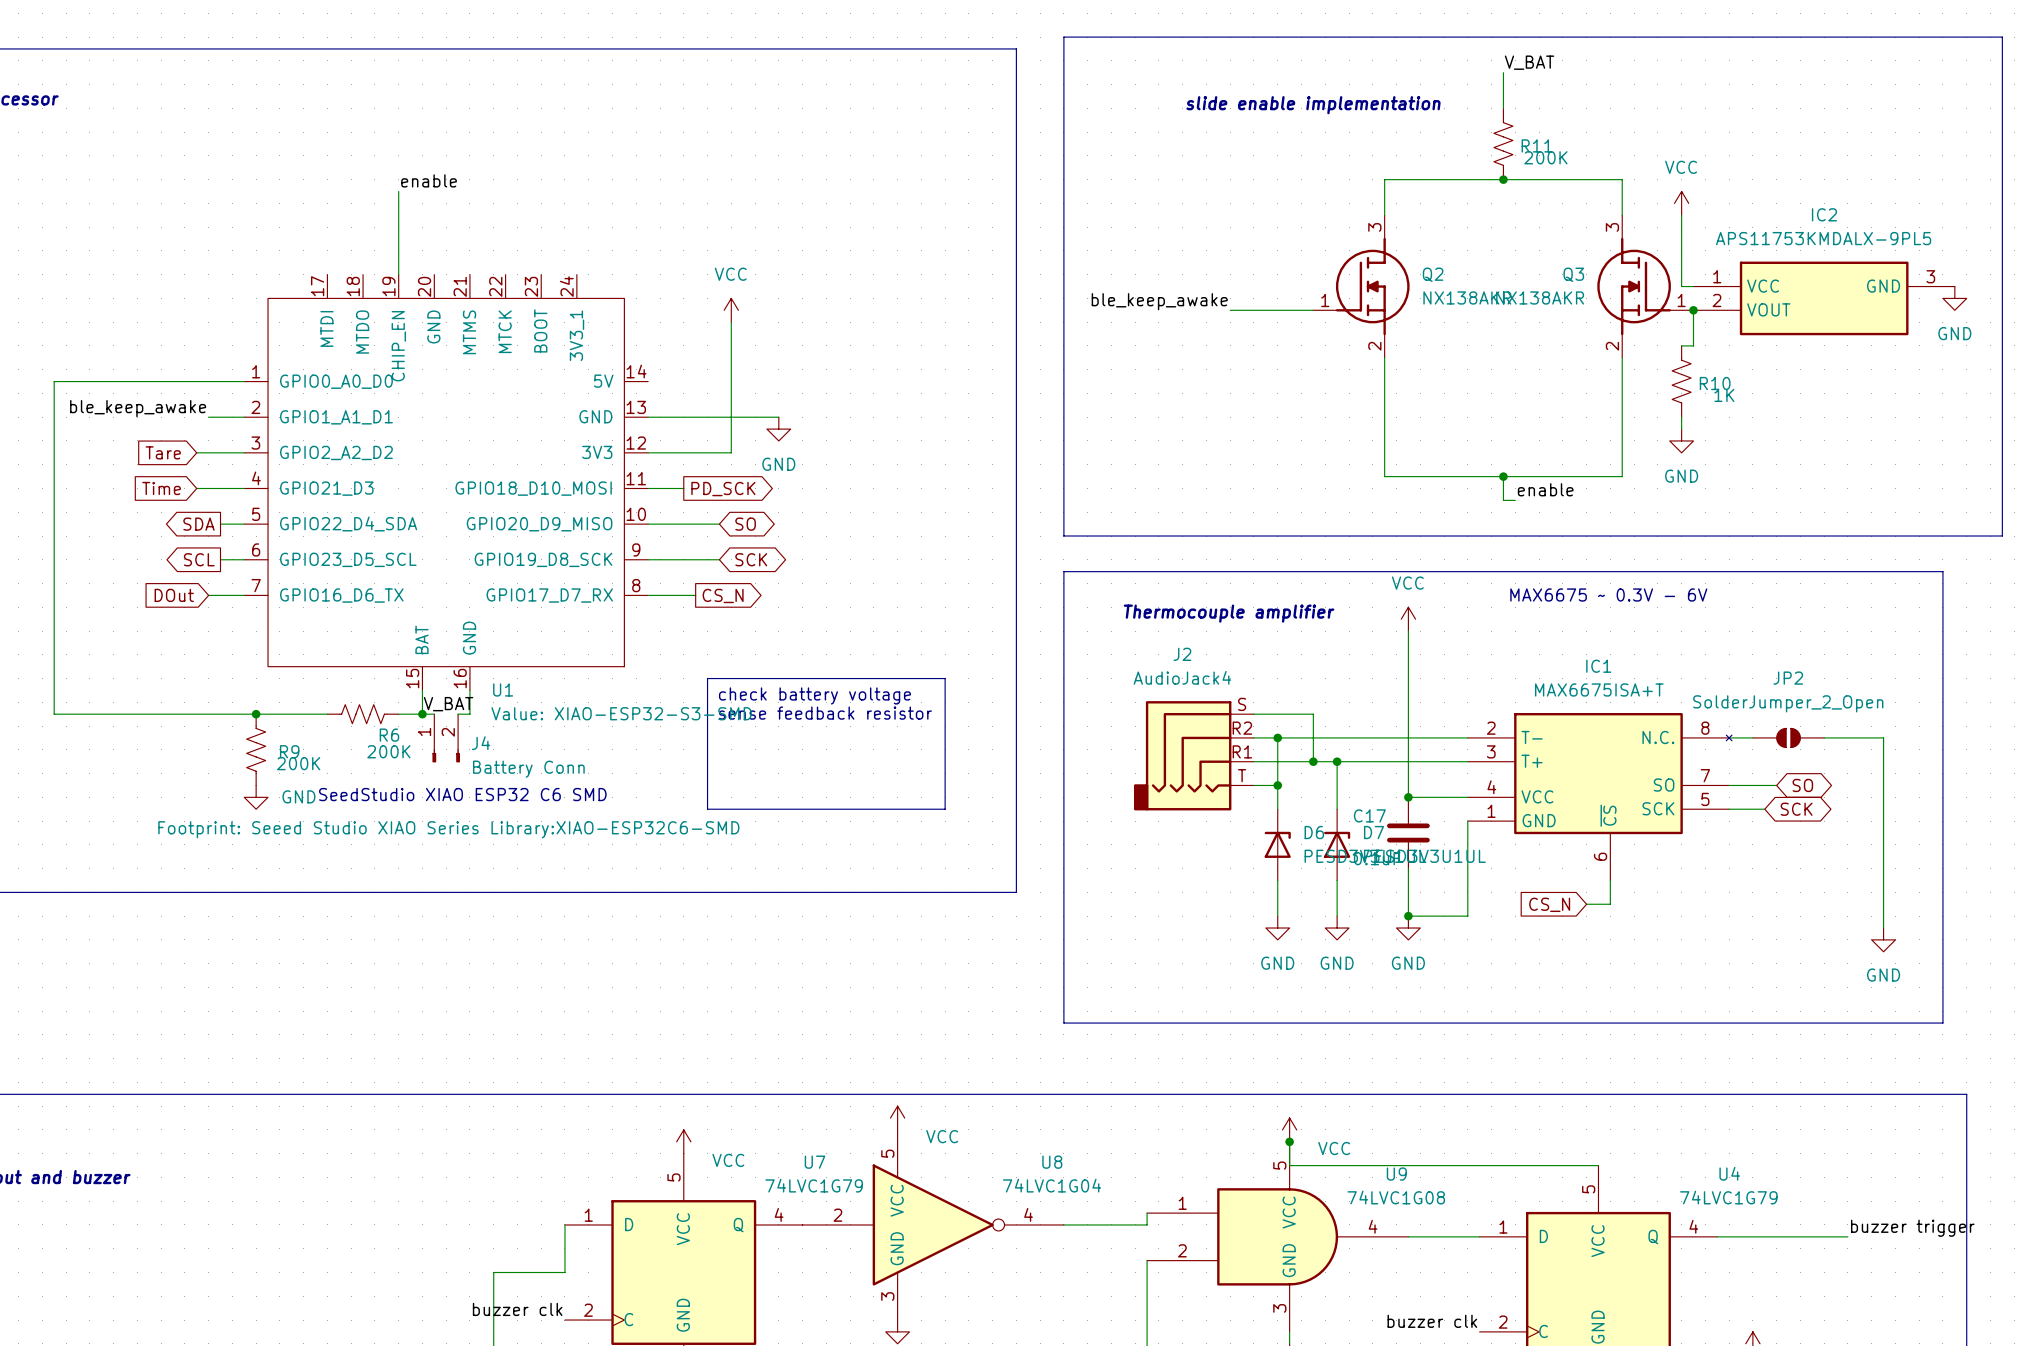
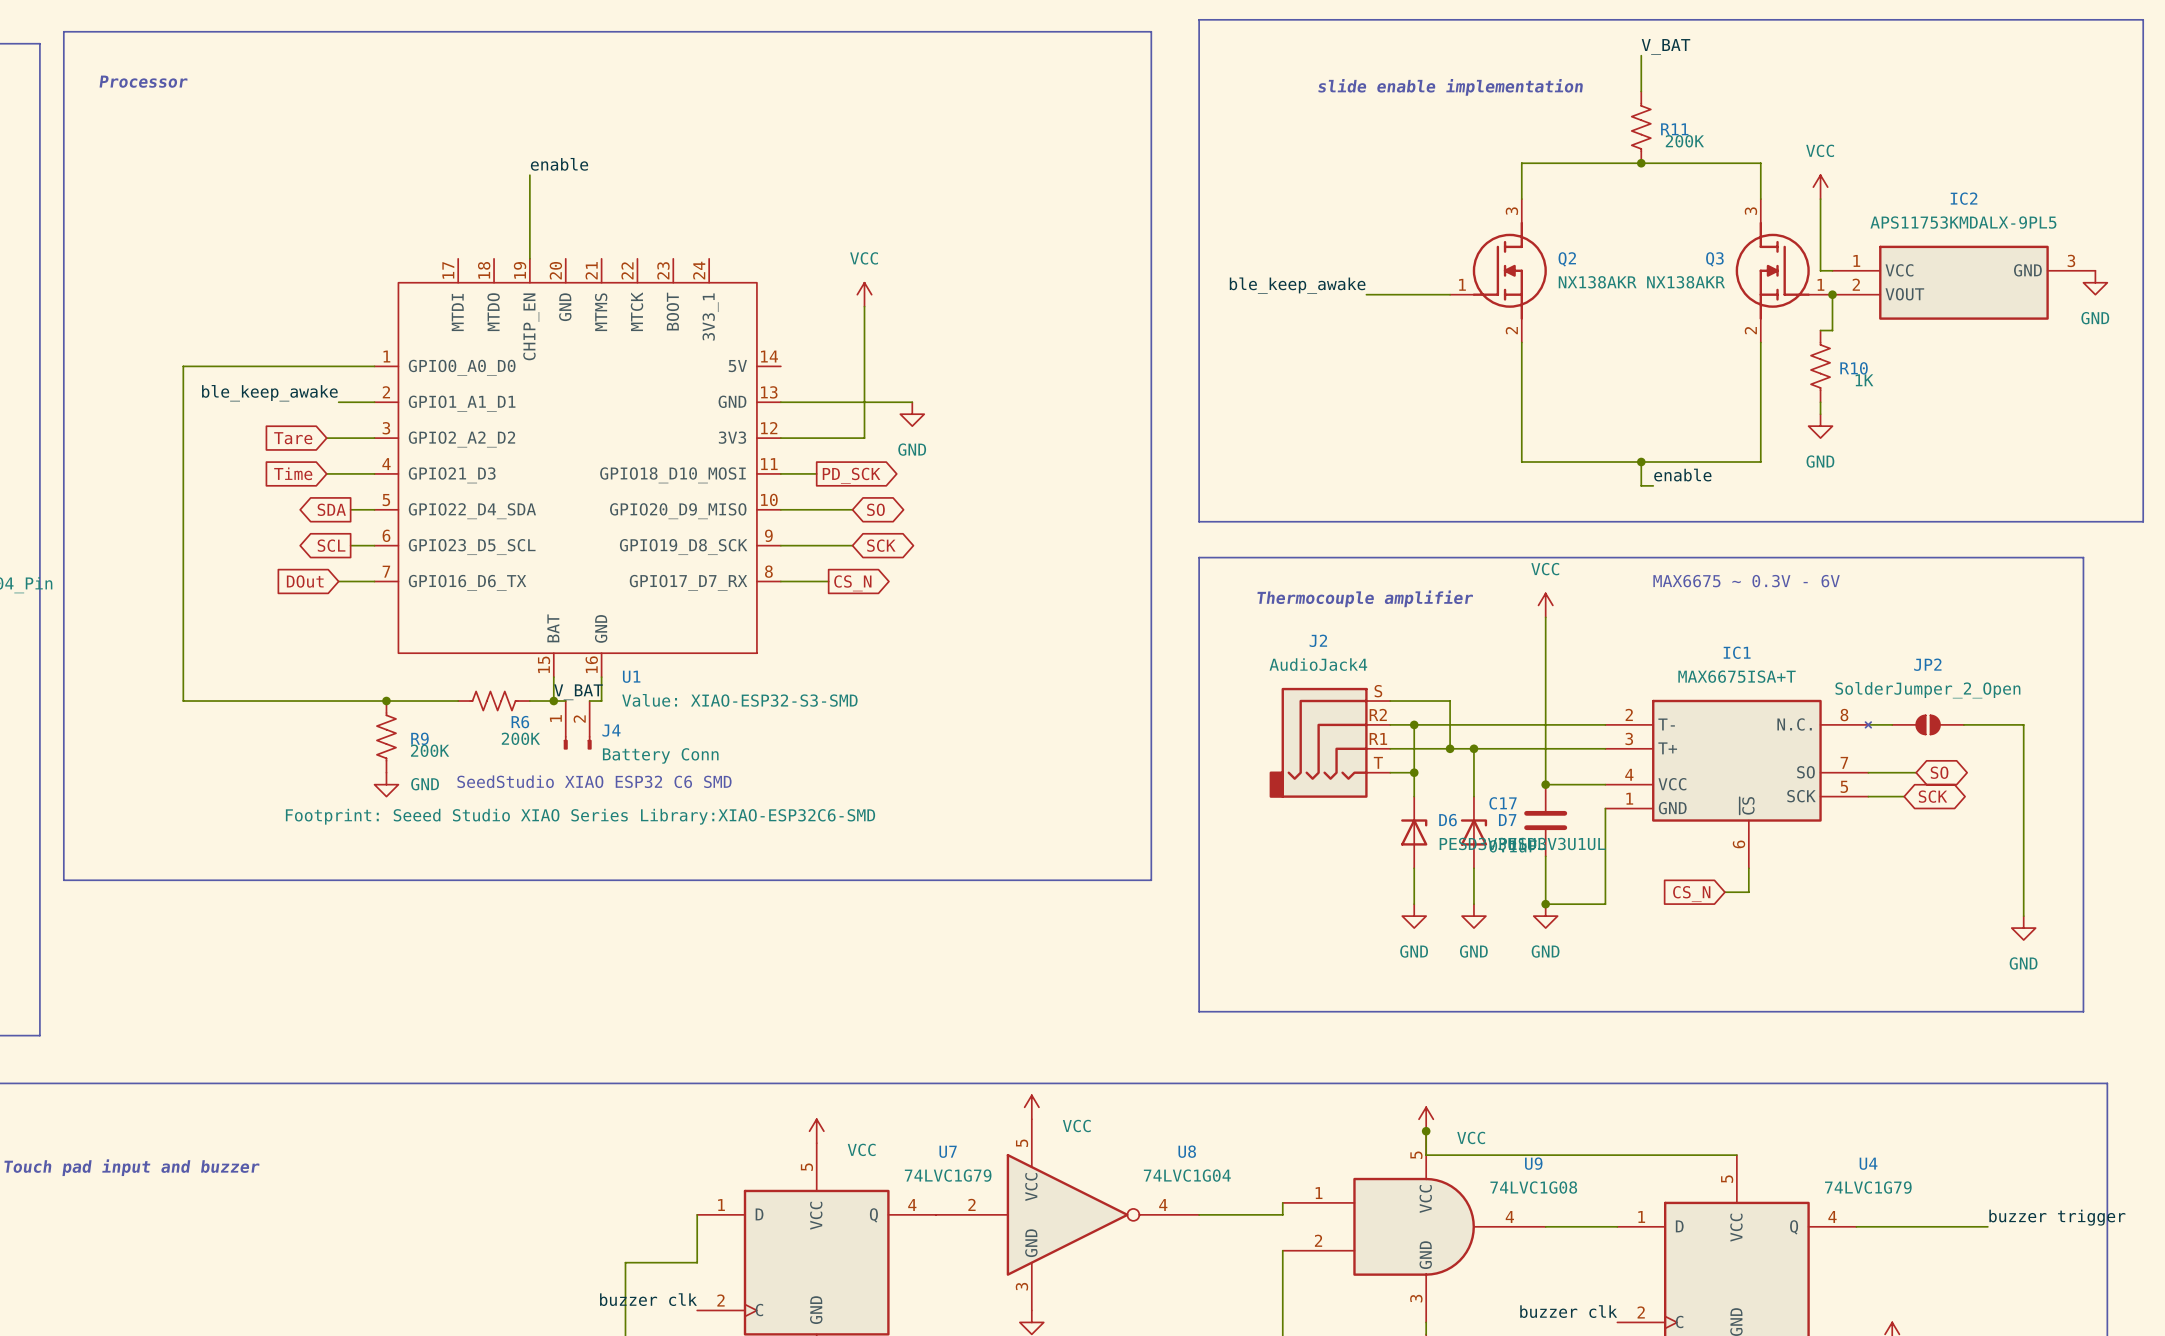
line: (707, 678) (945, 678) (945, 809) (707, 809) (707, 678) -> none
text: check battery voltage (814, 695) -> none
text: sense feedback resistor (825, 713) -> none

